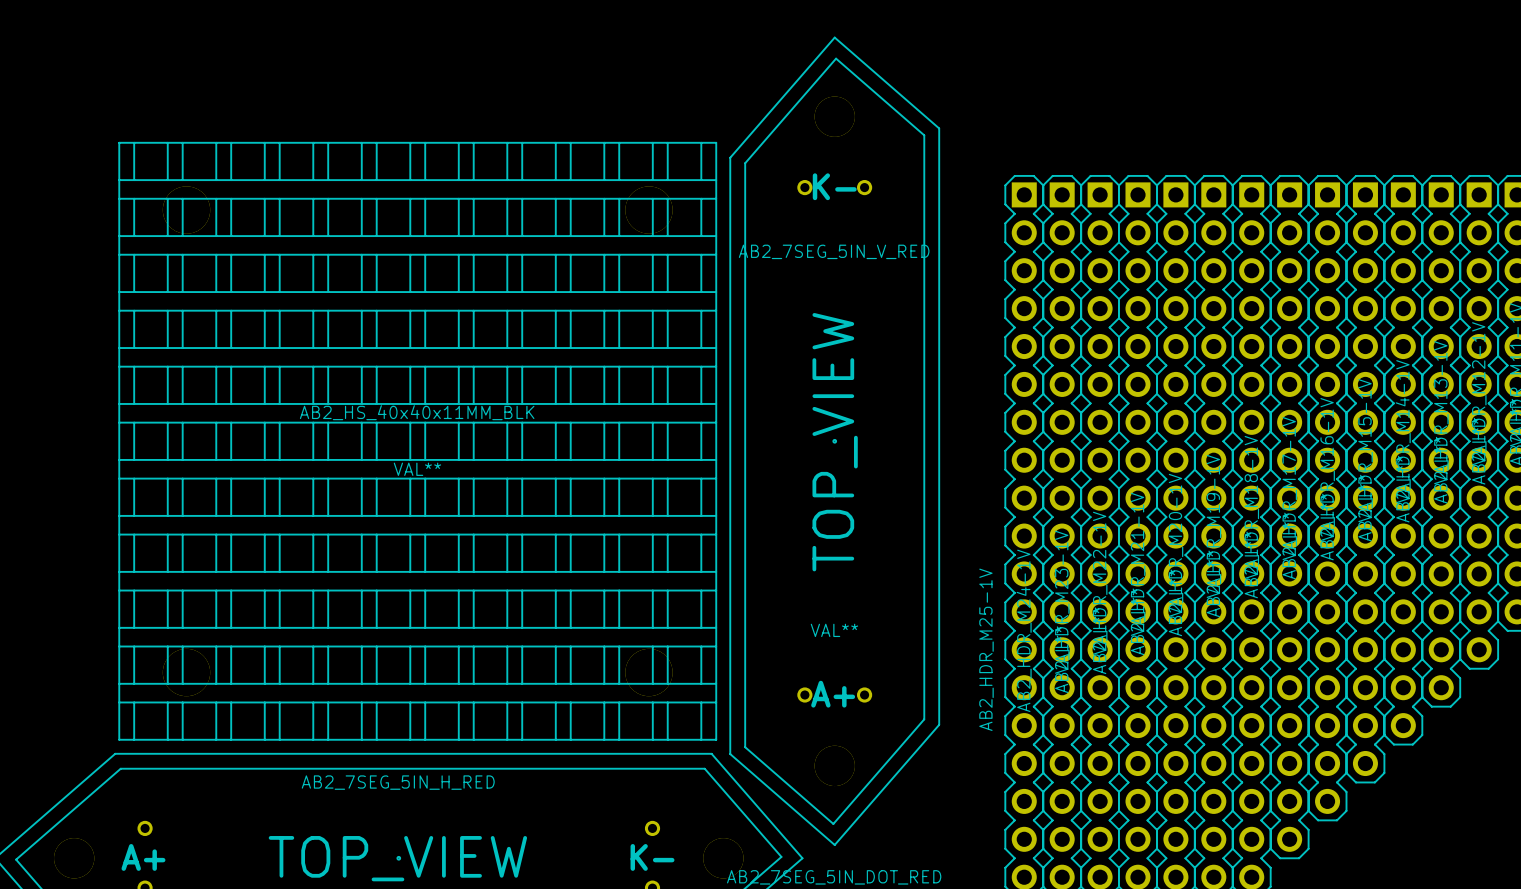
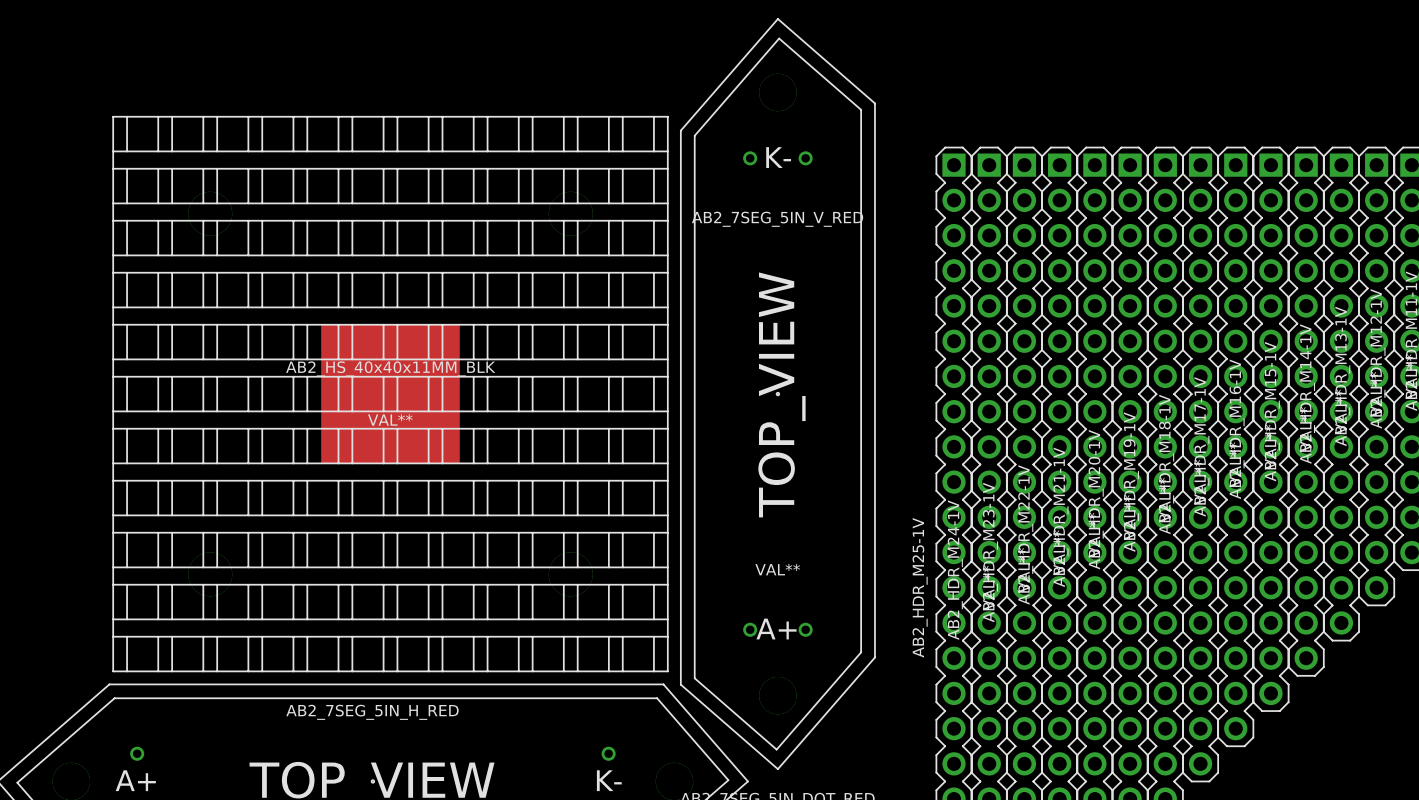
AB2_HS_40x40x11MM_BLK footprint: [118, 141, 718, 741] -> [112, 115, 669, 673]

